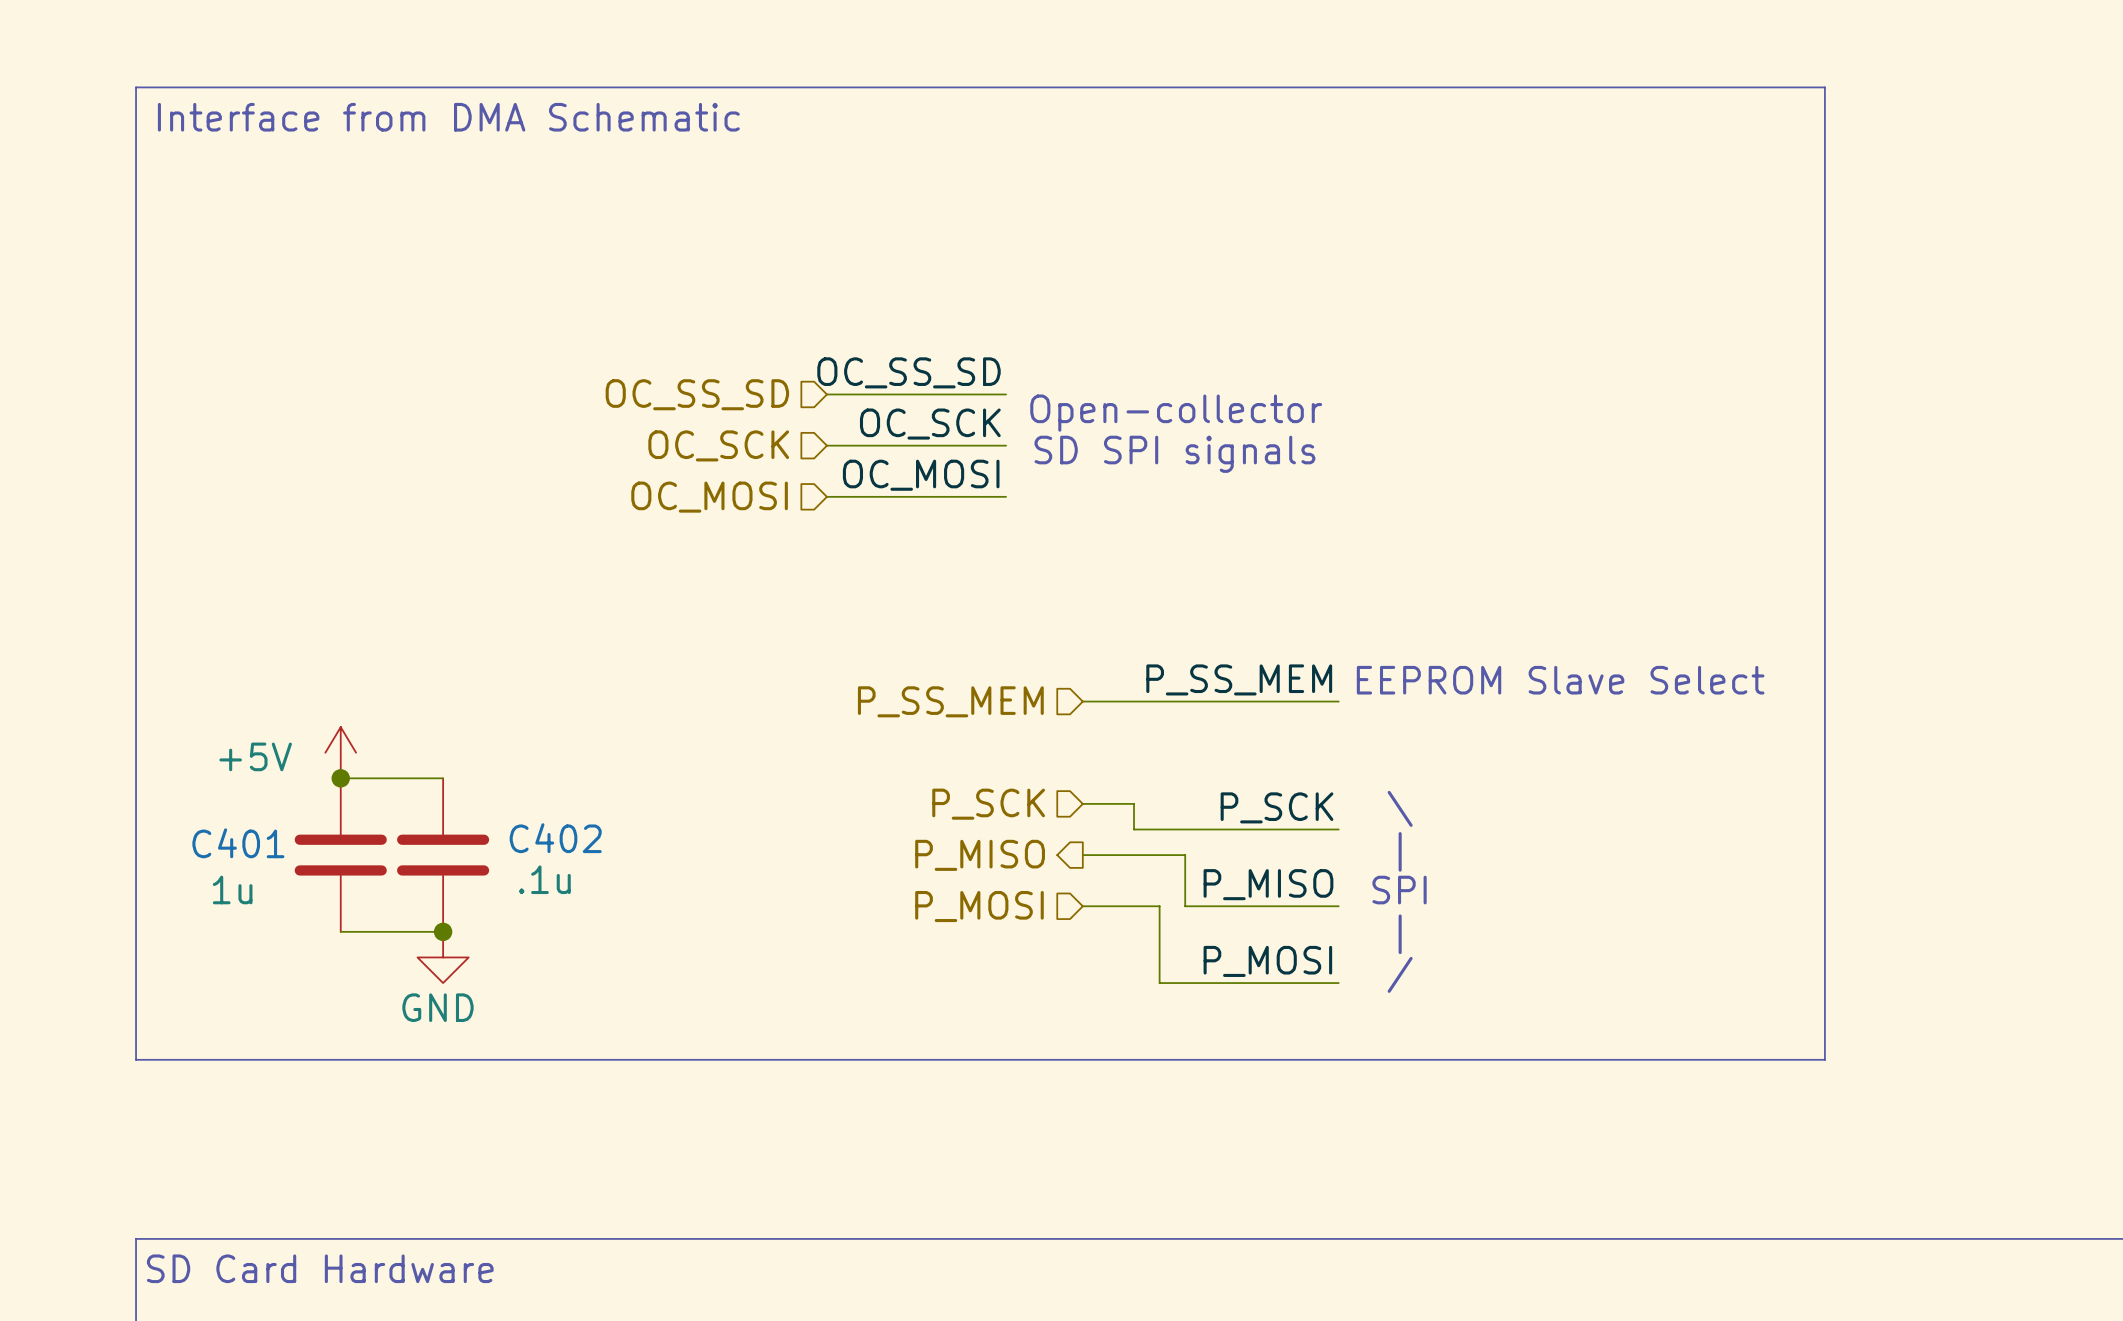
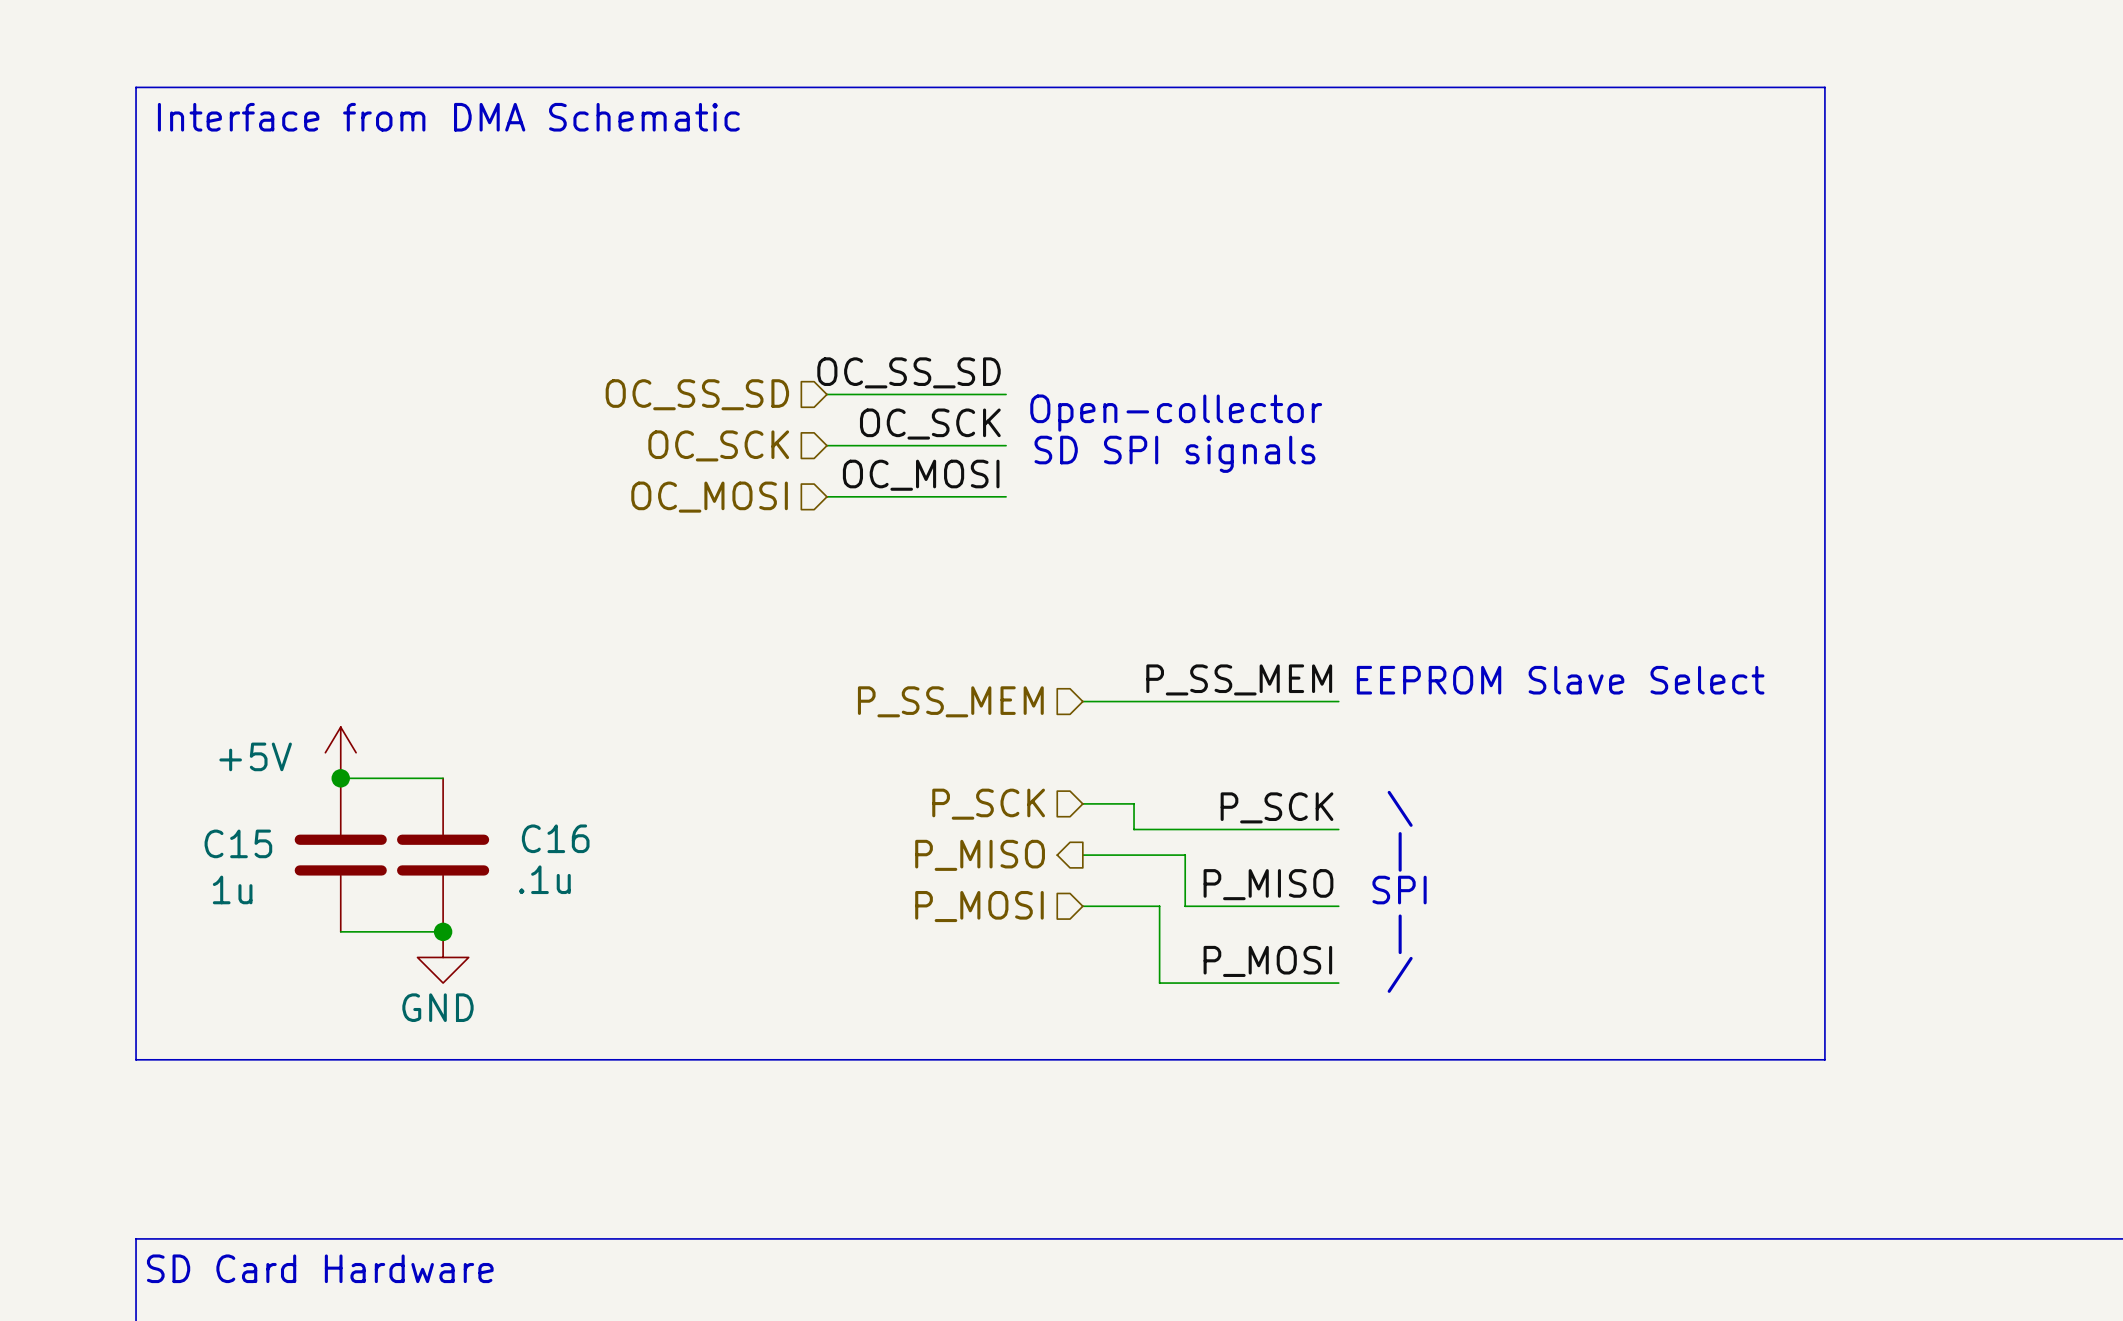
C402 name: C402 (555, 838) -> C16 (555, 838)
C401 name: C401 (238, 843) -> C15 (238, 843)

